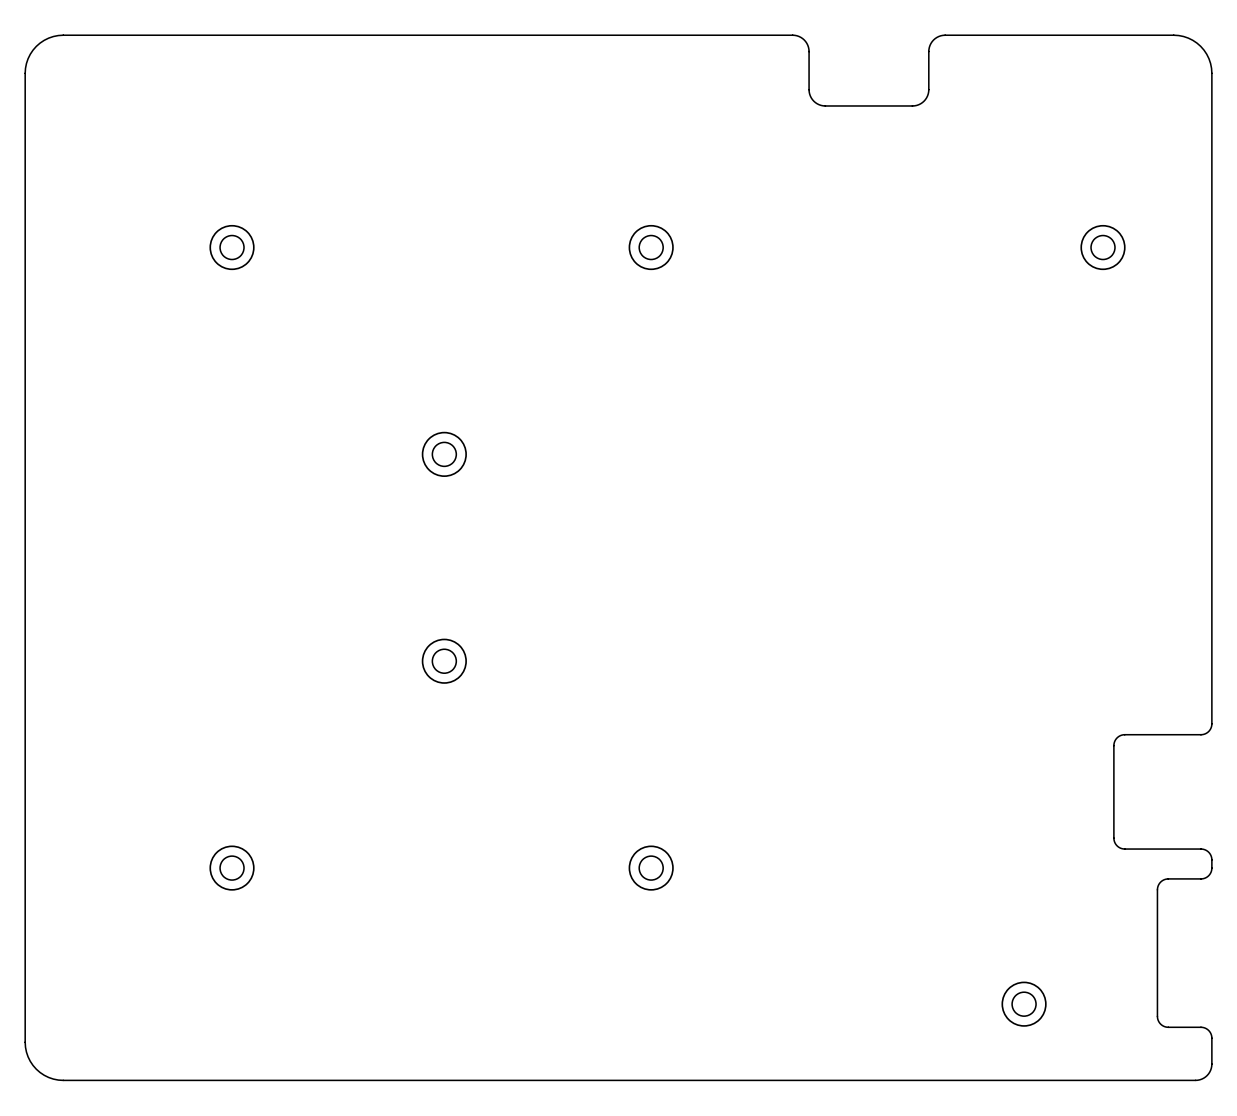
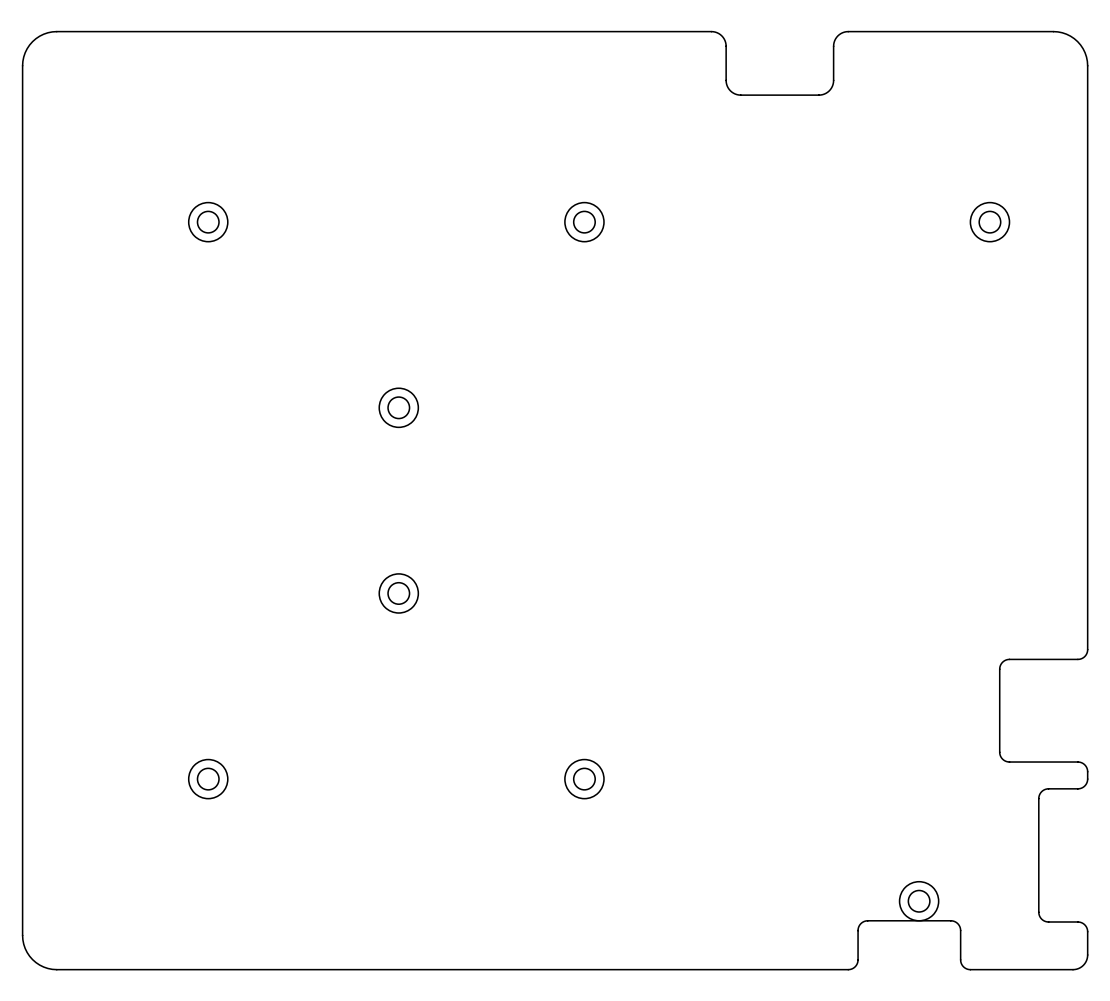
board edge: (945, 1080) (1081, 1080) -> (848, 969) (854, 967) (857, 963) (858, 928) (861, 922) (867, 920) (954, 921) (960, 929) (960, 962) (964, 967) (970, 969)

